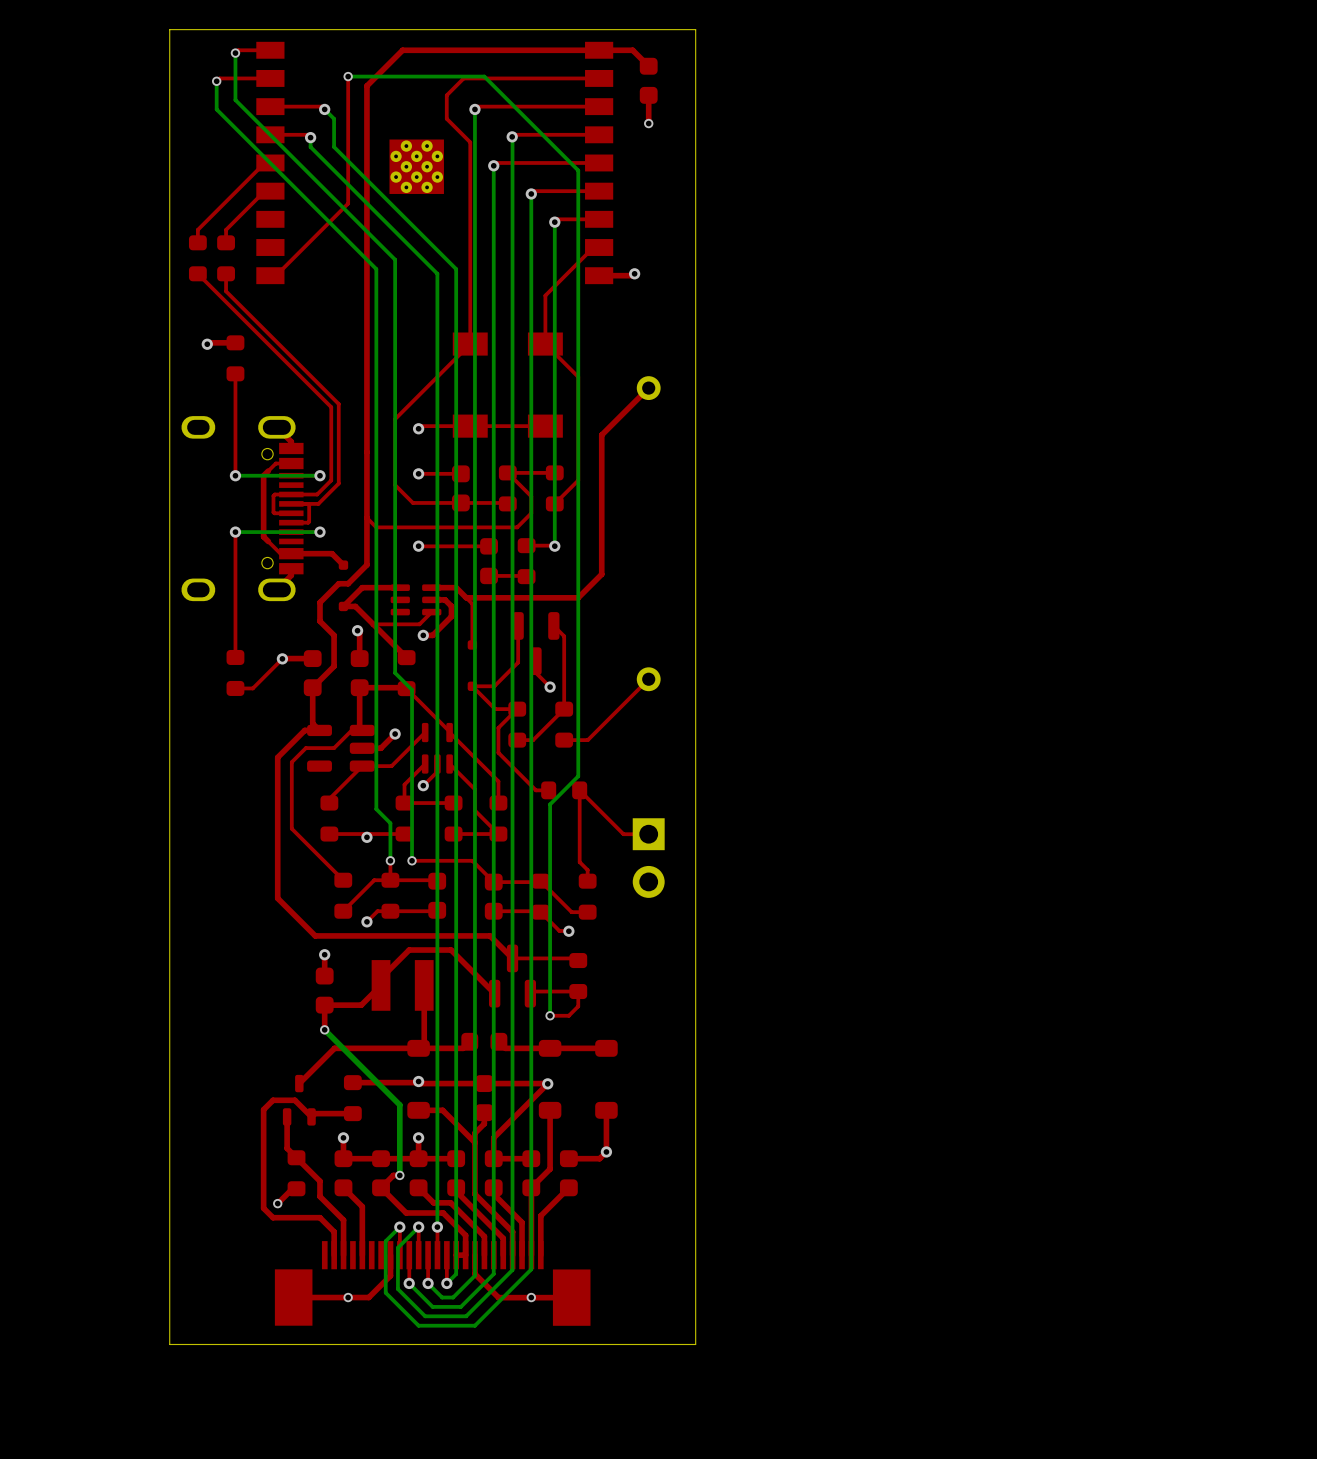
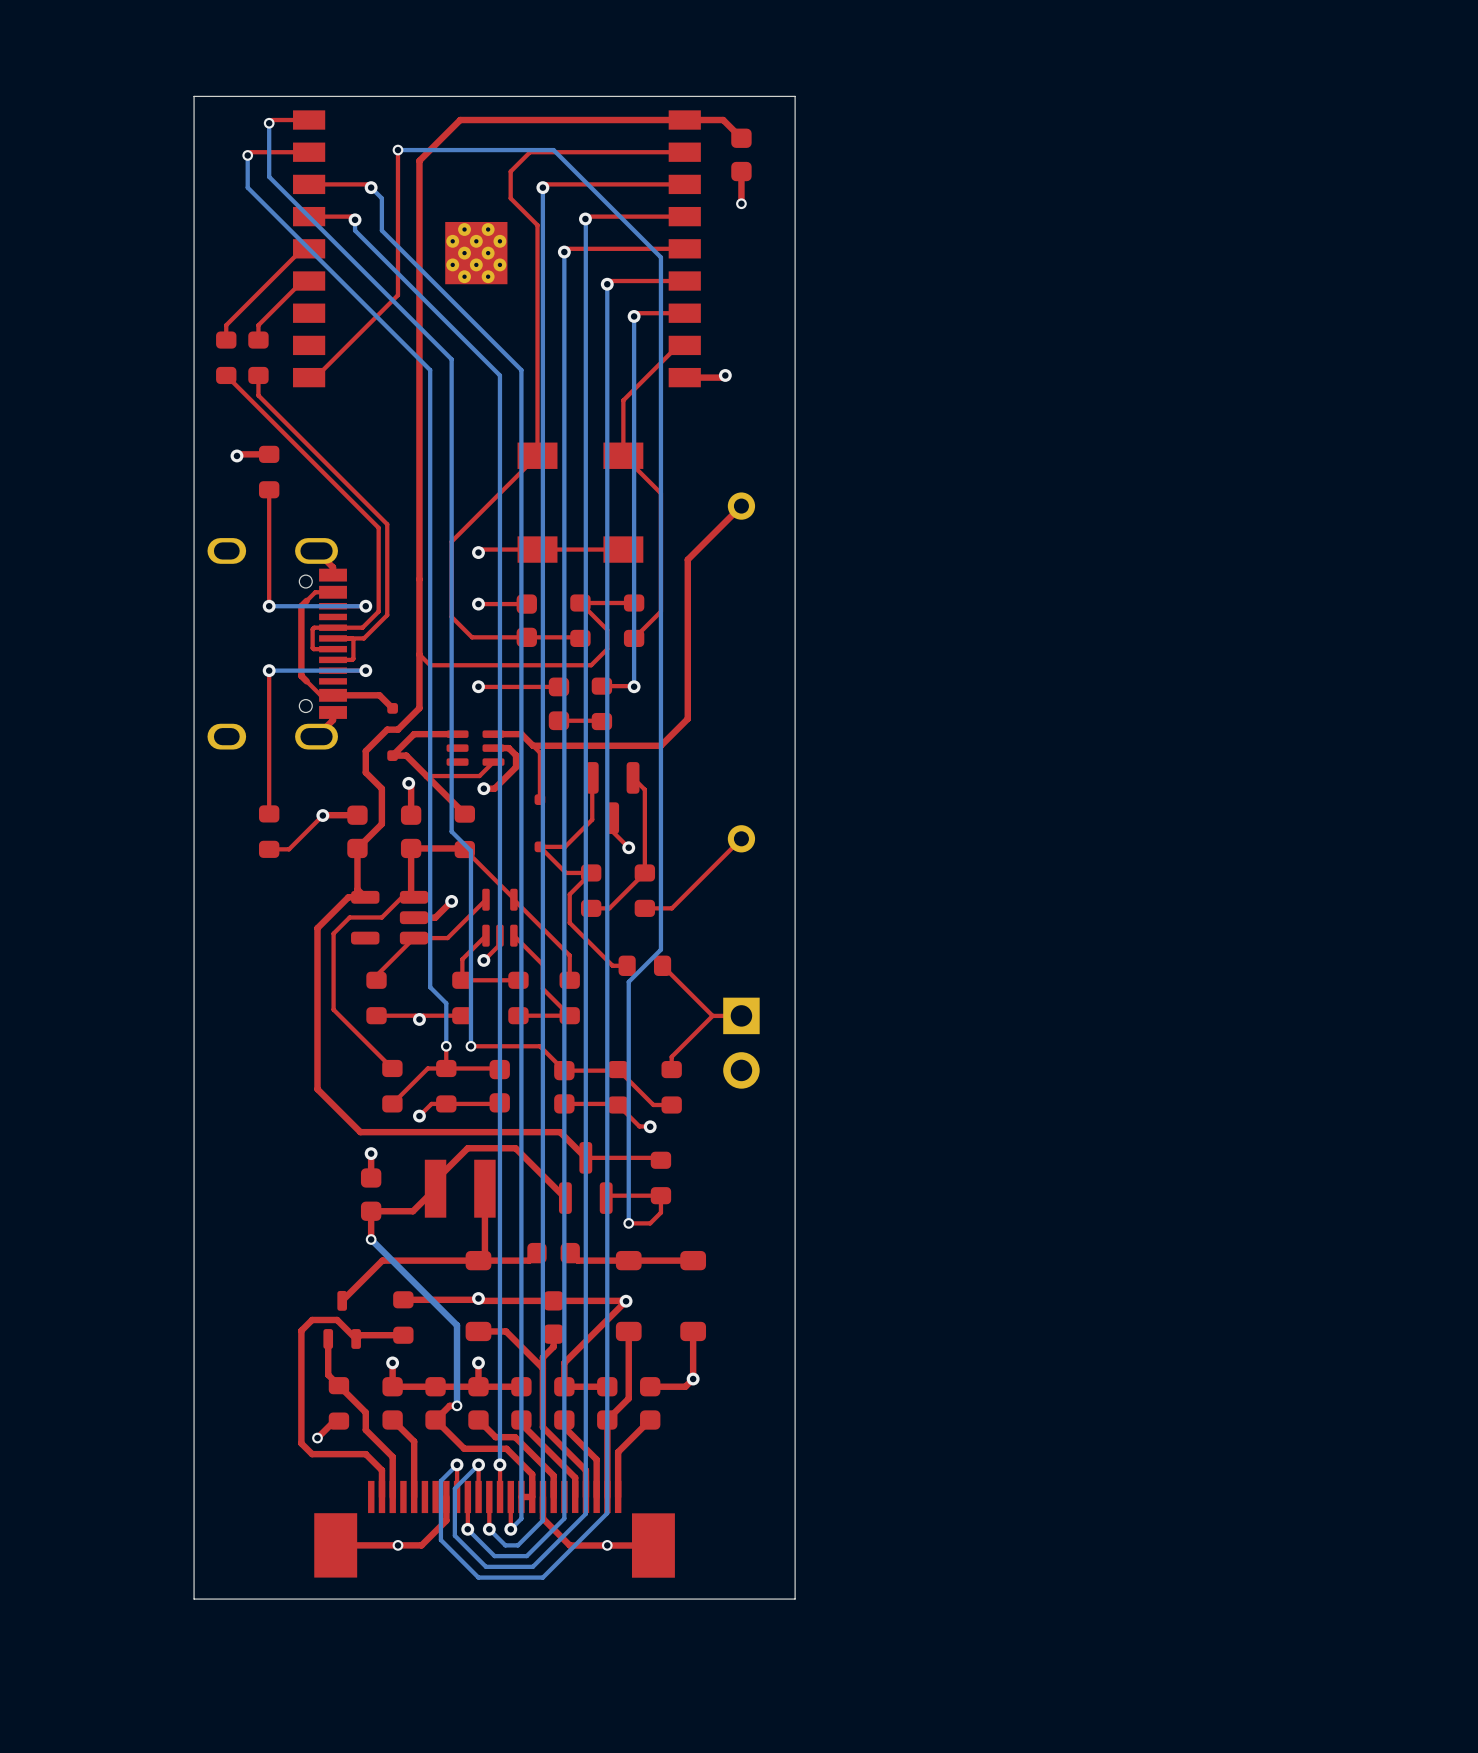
top track: (579, 790) (579, 862) (587, 870) -> (712, 1015) (671, 1056)

